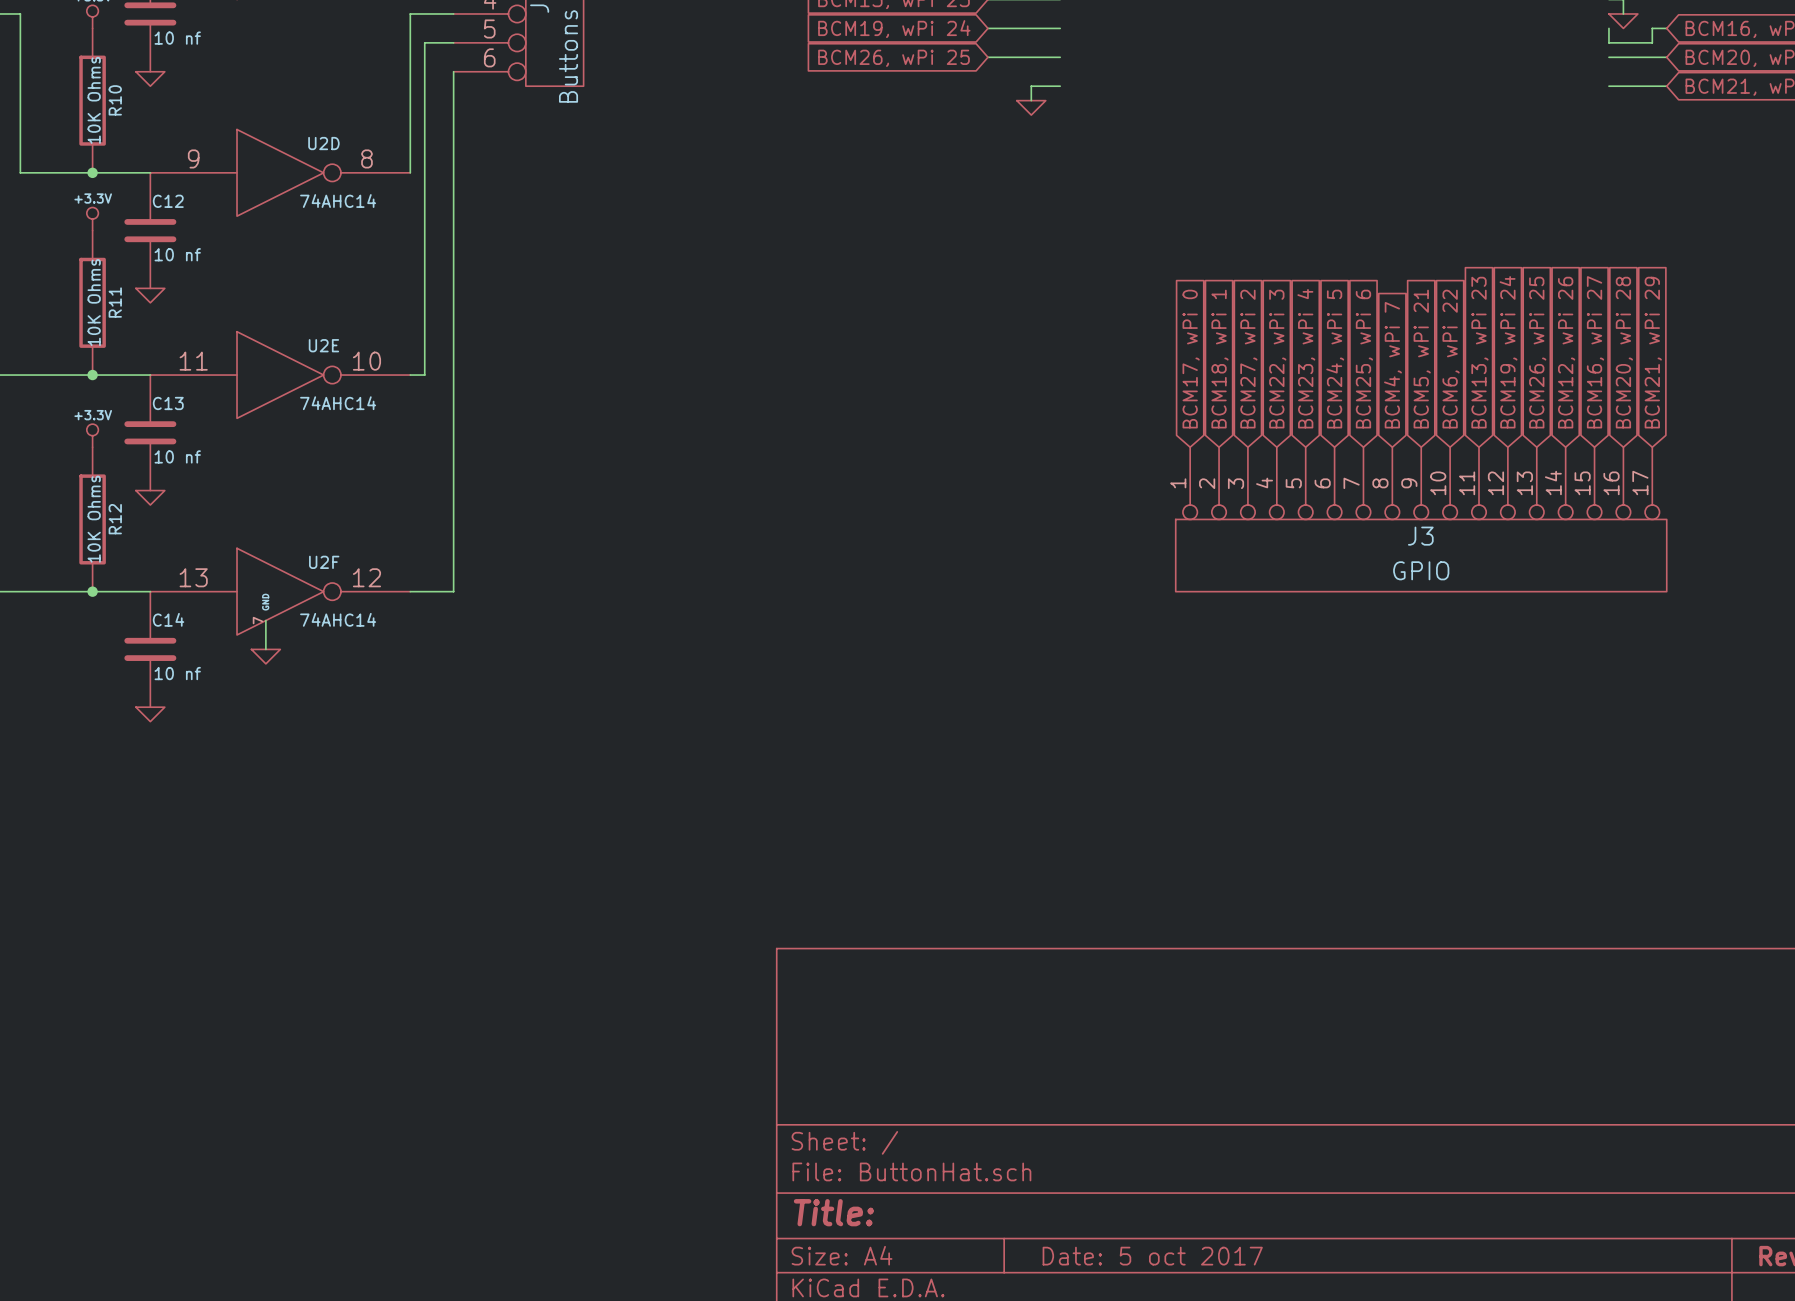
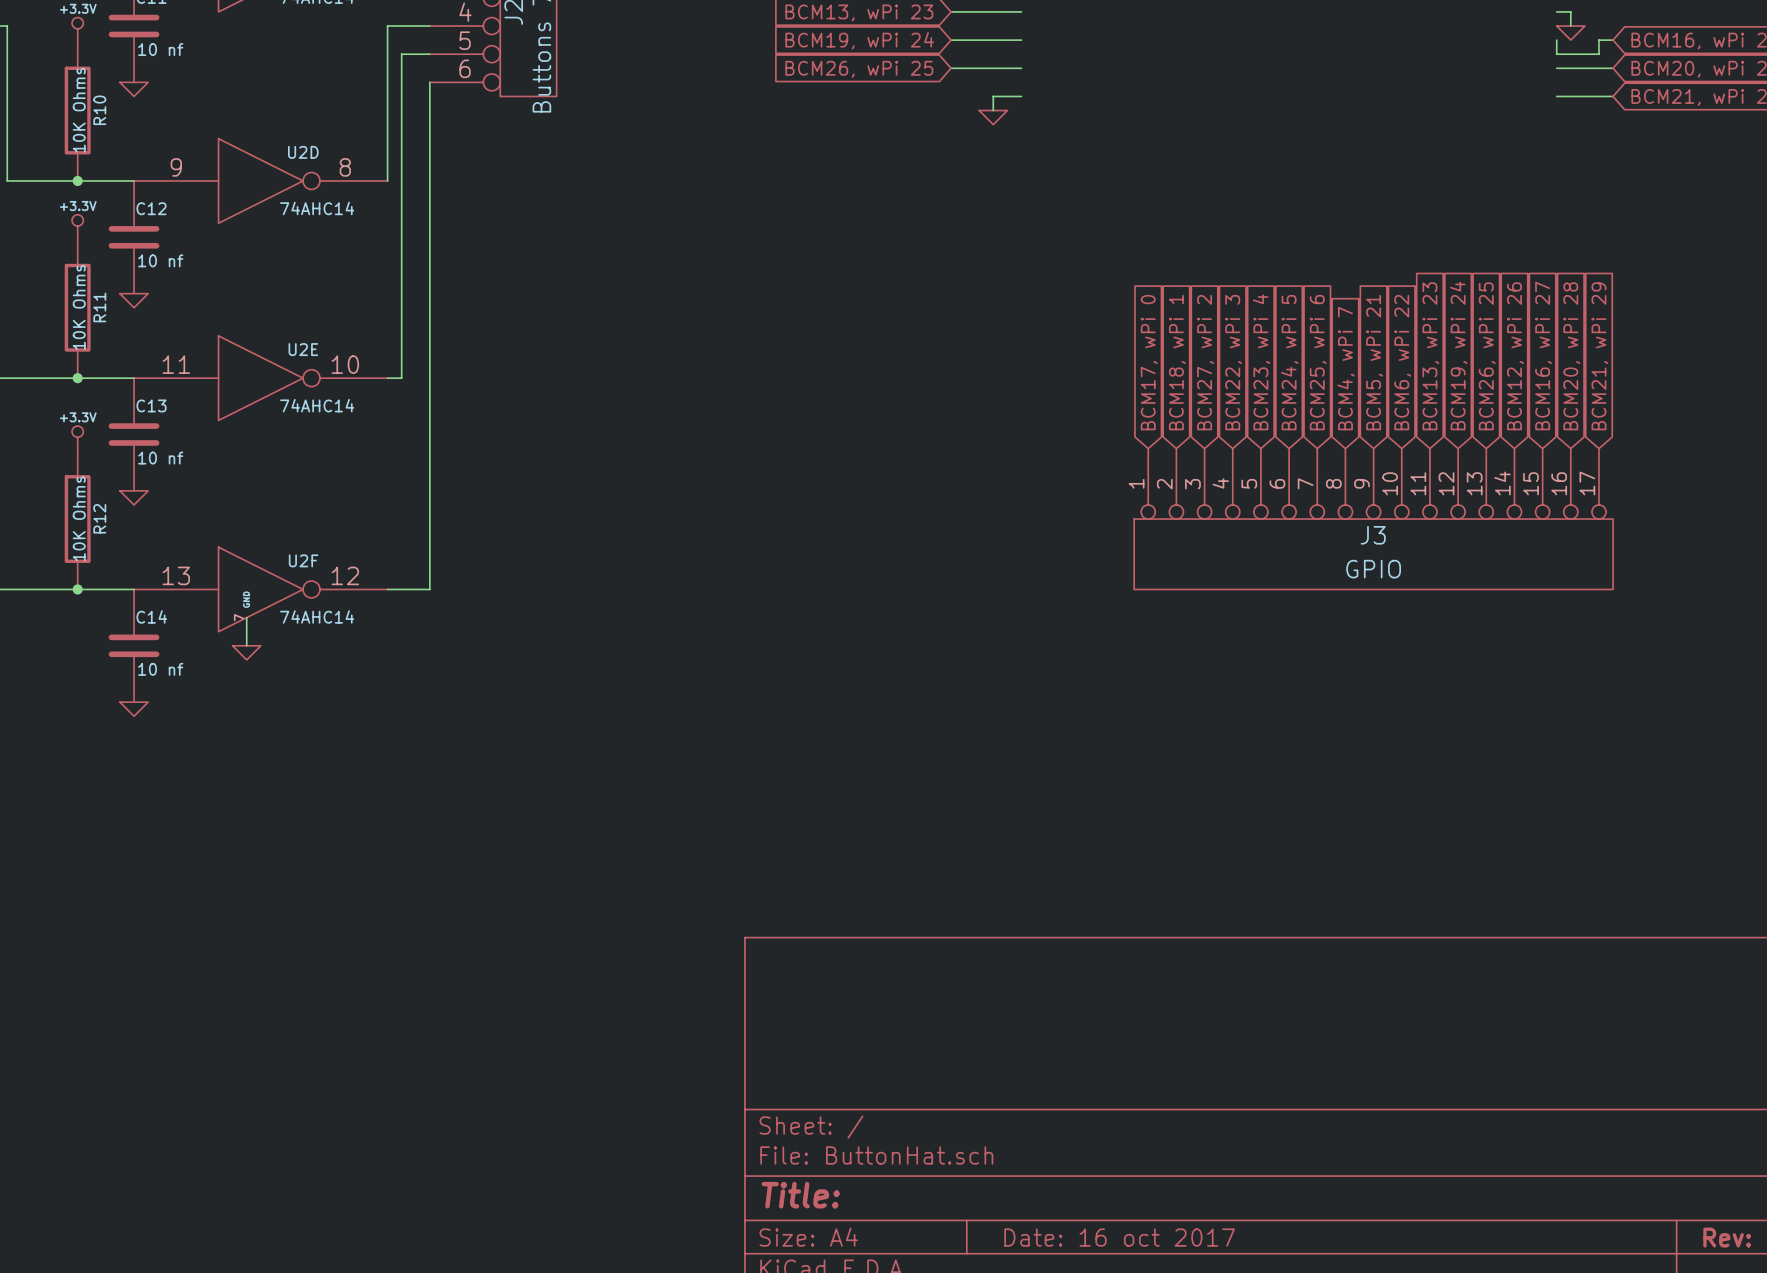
title block: Date: 5 oct 2017 (1152, 1256) -> Date: 16 oct 2017 (1119, 1237)

